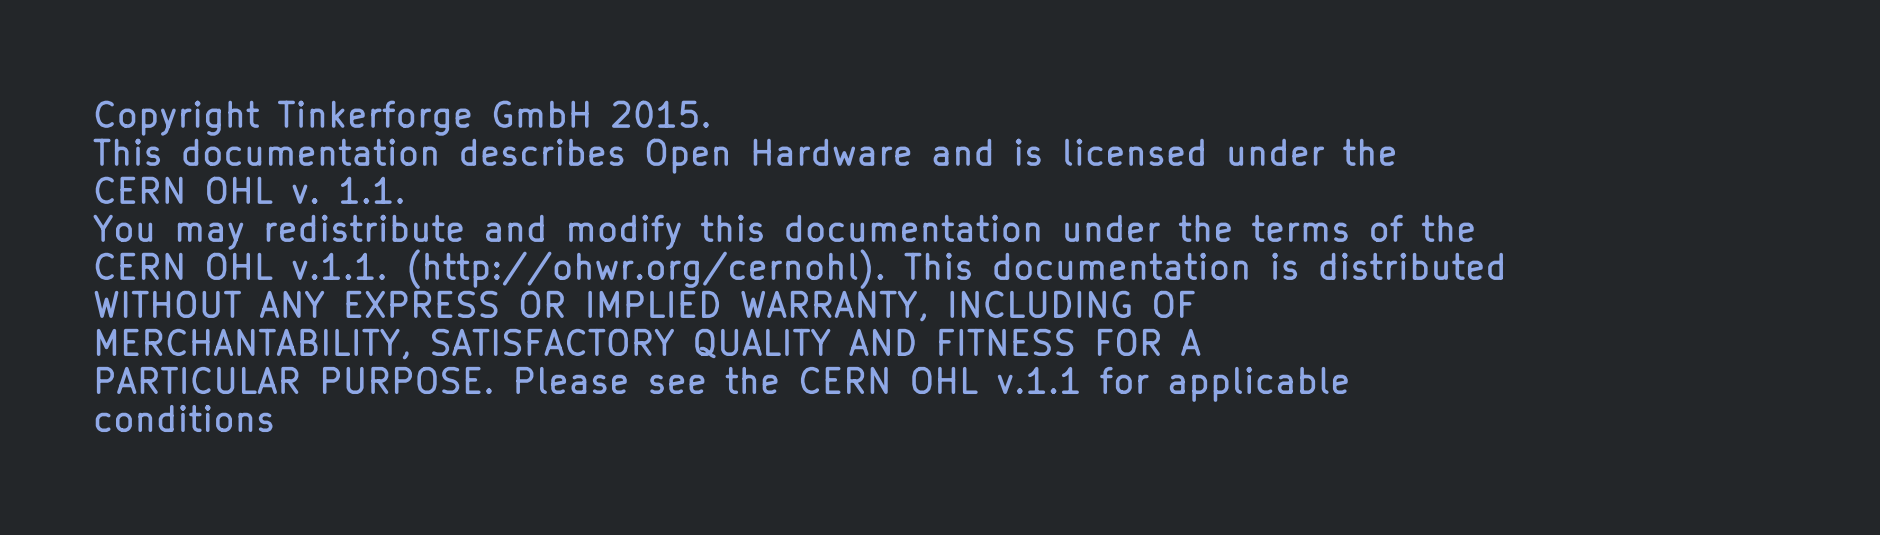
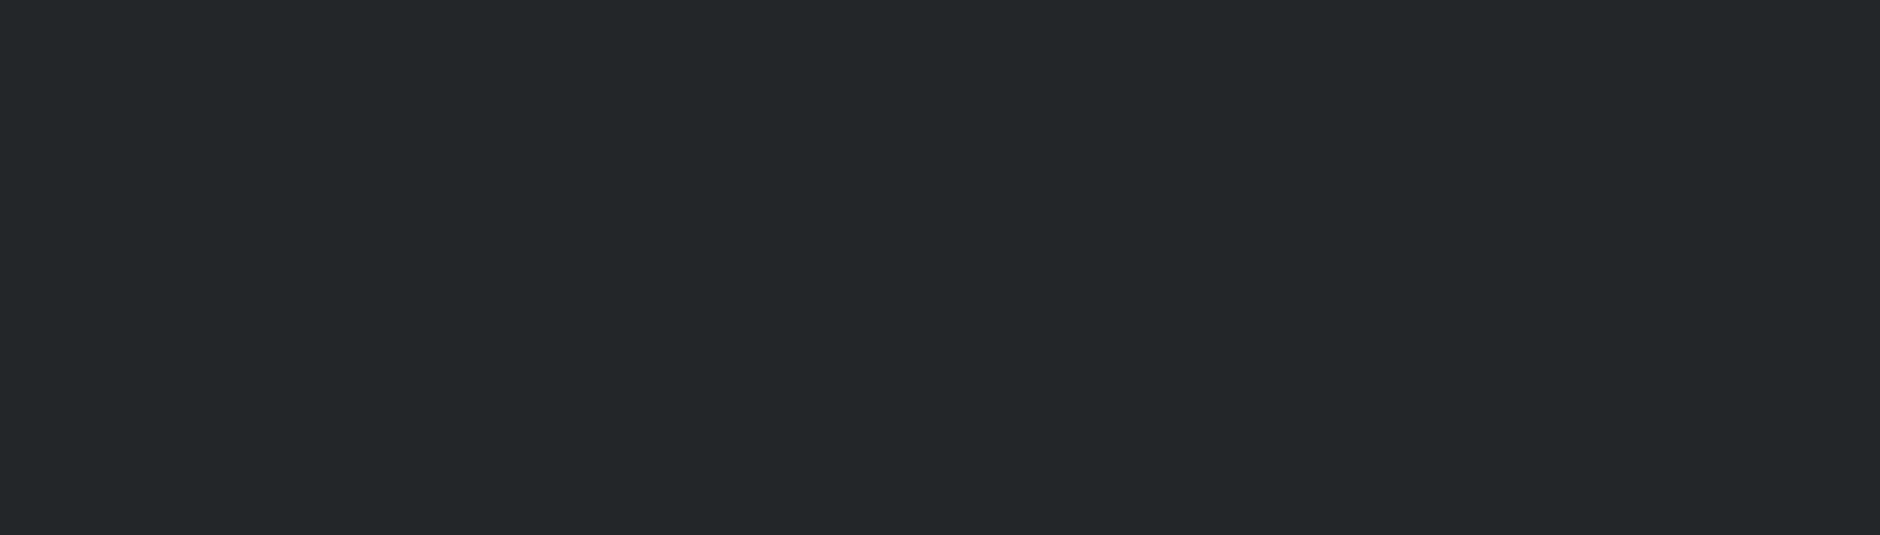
text: Copyright Tinkerforge GmbH 2015. (402, 118) -> none
text: This documentation describes Open Hardware and is licensed under the (744, 156) -> none
text: CERN OHL v. 1.1. (249, 190) -> none
text: You may redistribute and modify this documentation under the terms of the (783, 232) -> none
text: CERN OHL v.1.1. (http://ohwr.org/cernohl). This documentation is distributed (799, 269) -> none
text: WITHOUT ANY EXPRESS OR IMPLIED WARRANTY, INCLUDING OF (644, 306) -> none
text: MERCHANTABILITY, SATISFACTORY QUALITY AND FITNESS FOR A (648, 344) -> none
text: PARTICULAR PURPOSE. Please see the CERN OHL v.1.1 for applicable (722, 384) -> none
text: conditions (184, 418) -> none

